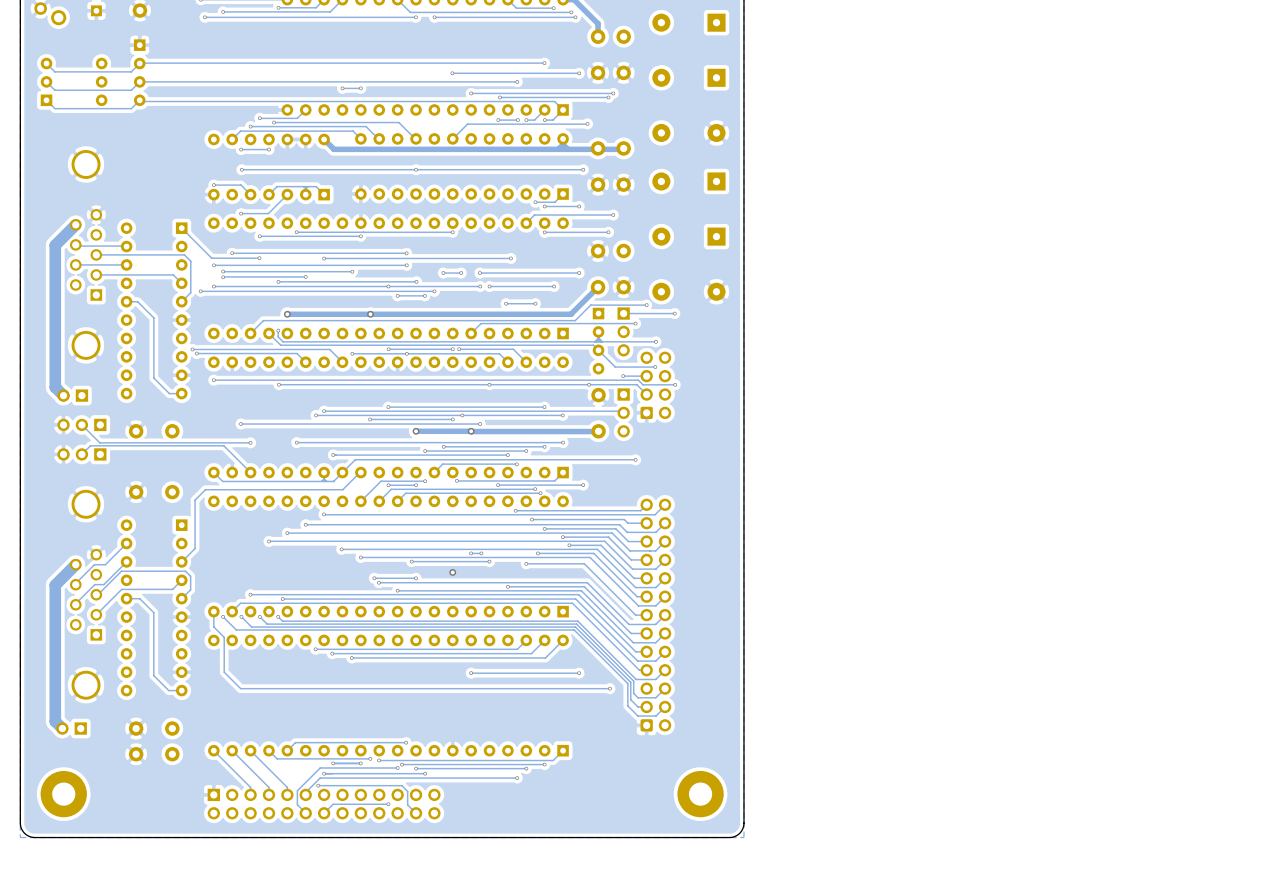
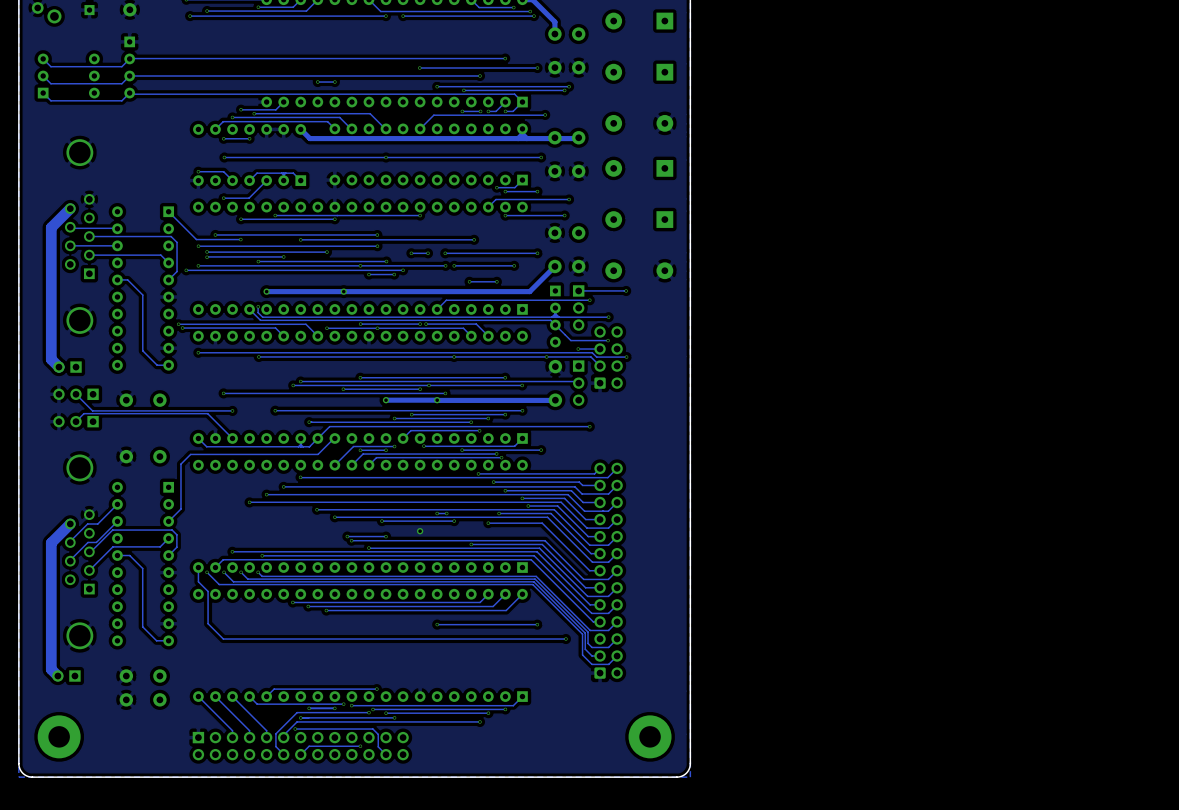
track: (646, 305) (590, 305) (575, 320) (263, 320) (250, 333) -> none
via: (646, 305) -> none

